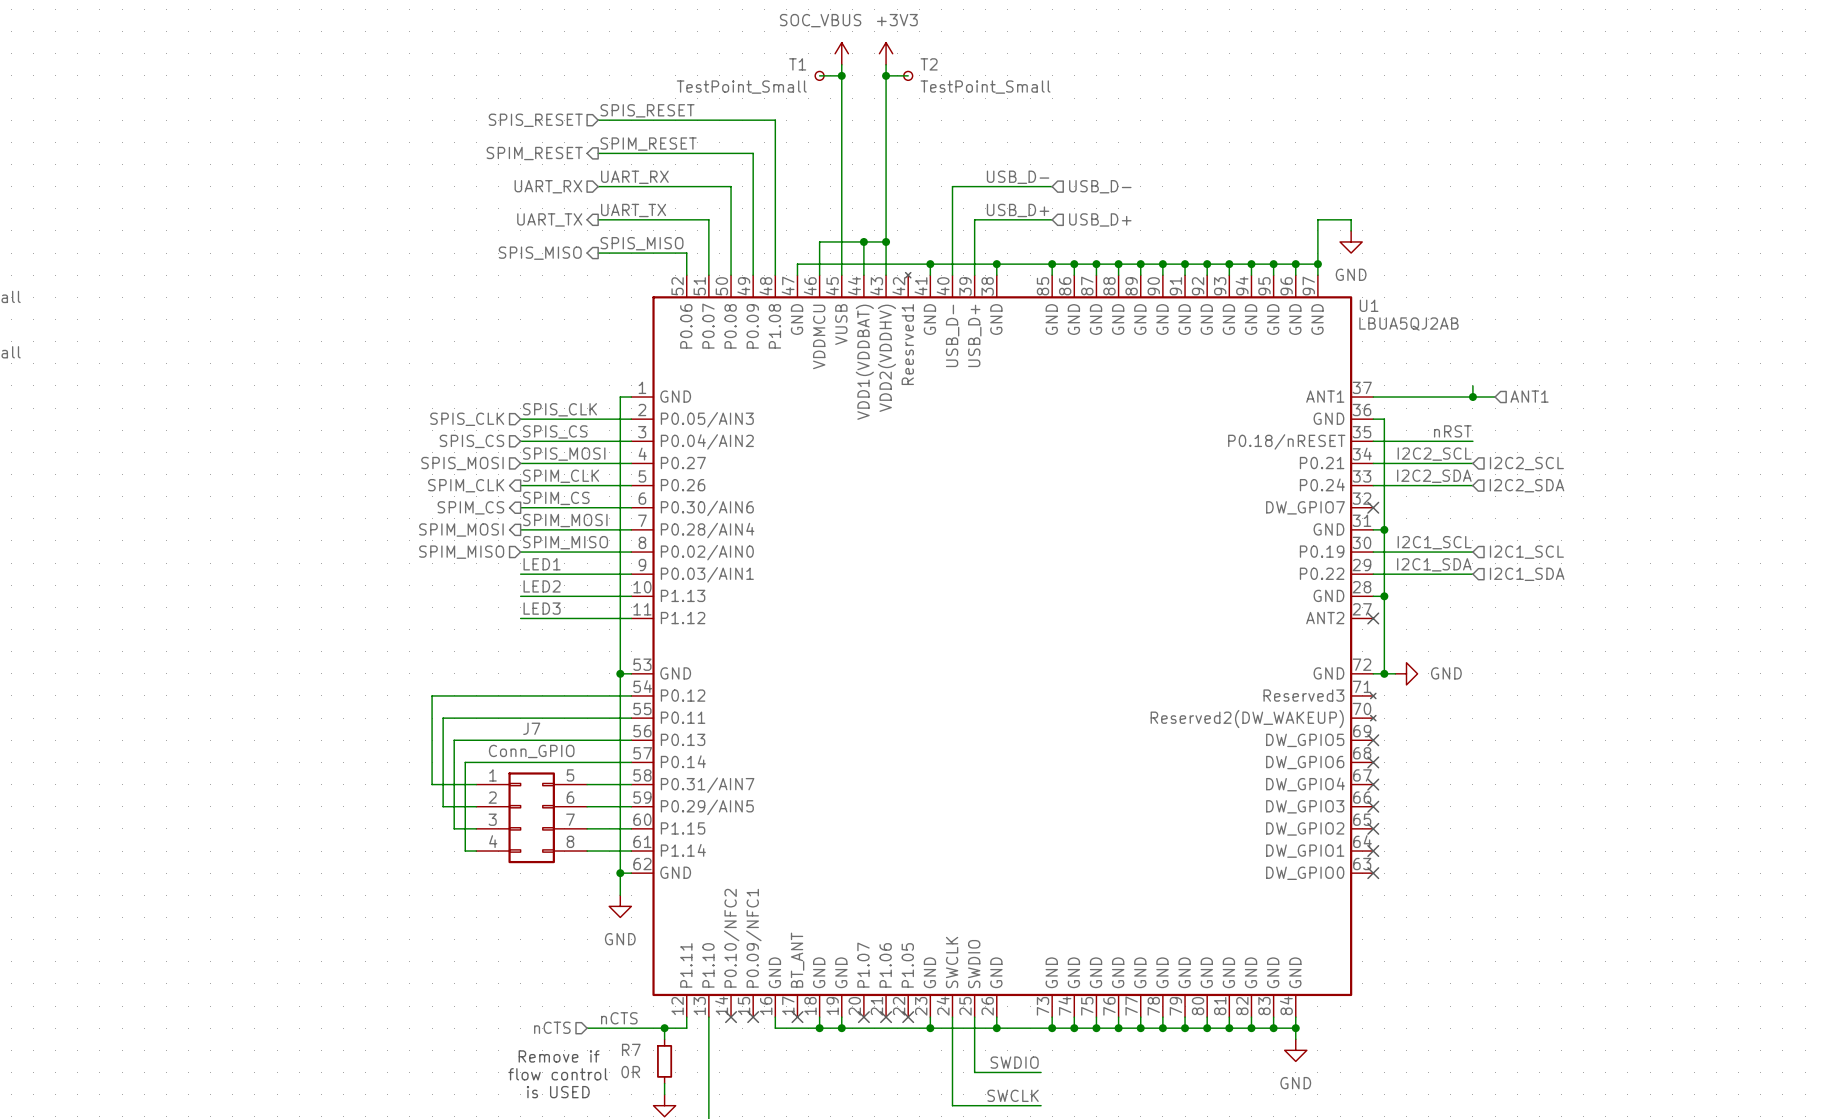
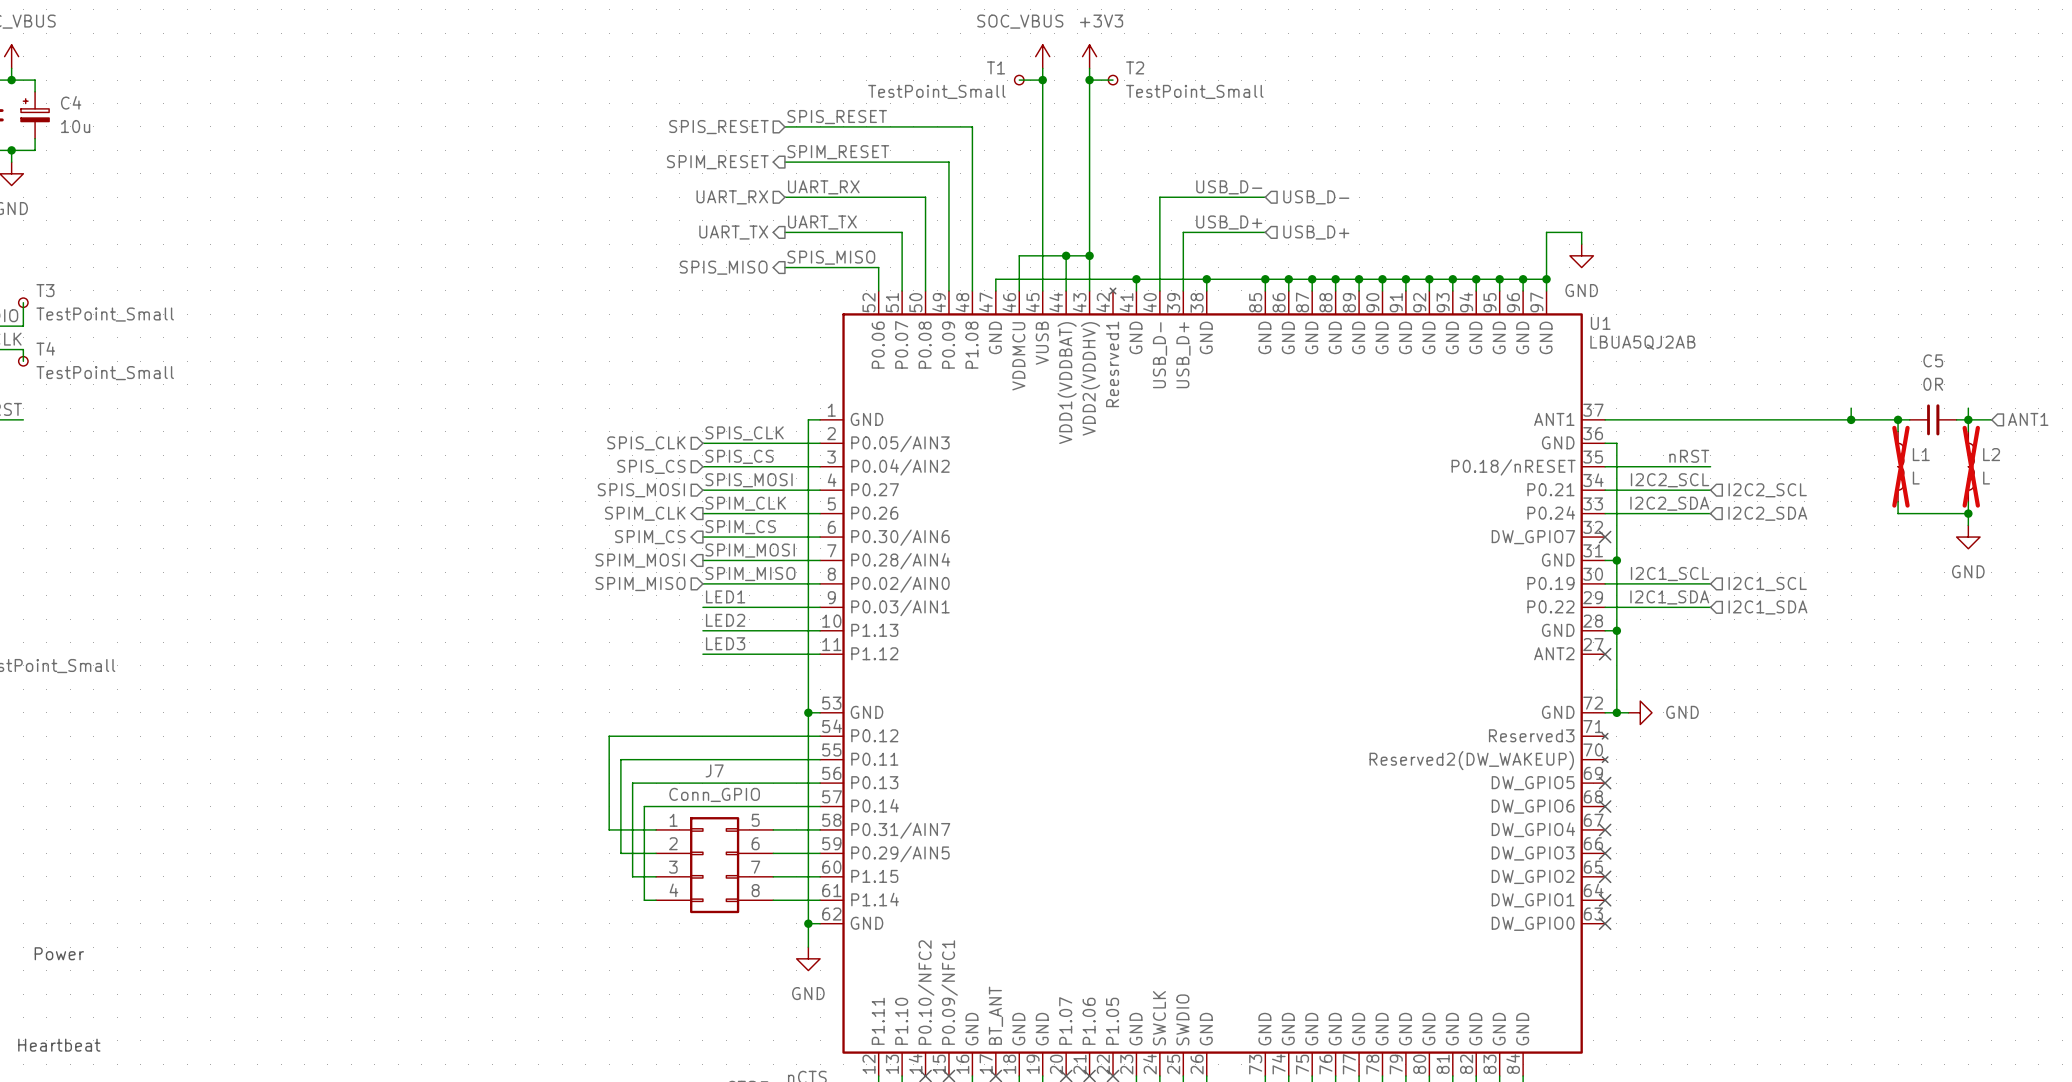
wire: (1472, 385) (1472, 397) -> (1851, 408) (1851, 419)
wire: none -> (1968, 408) (1968, 431)
hierarchical label: ANT1 (1529, 396) -> none
hierarchical label: none -> ANT1 (2028, 419)
junction: (1472, 397) -> none
wire: none -> (1734, 419) (1909, 419)
junction: none -> (1851, 419)
wire: none -> (1898, 419) (1898, 431)
junction: none -> (1898, 419)
C5: none -> 0R (1933, 419)
wire: none -> (1956, 419) (1991, 419)
junction: none -> (1968, 419)
L1: none -> L (1900, 466)
L2: none -> L (1971, 466)
wire: none -> (1898, 501) (1898, 513) (1968, 513)
wire: none -> (1968, 501) (1968, 525)
junction: none -> (1968, 513)
power symbol: none -> GND (1968, 537)

